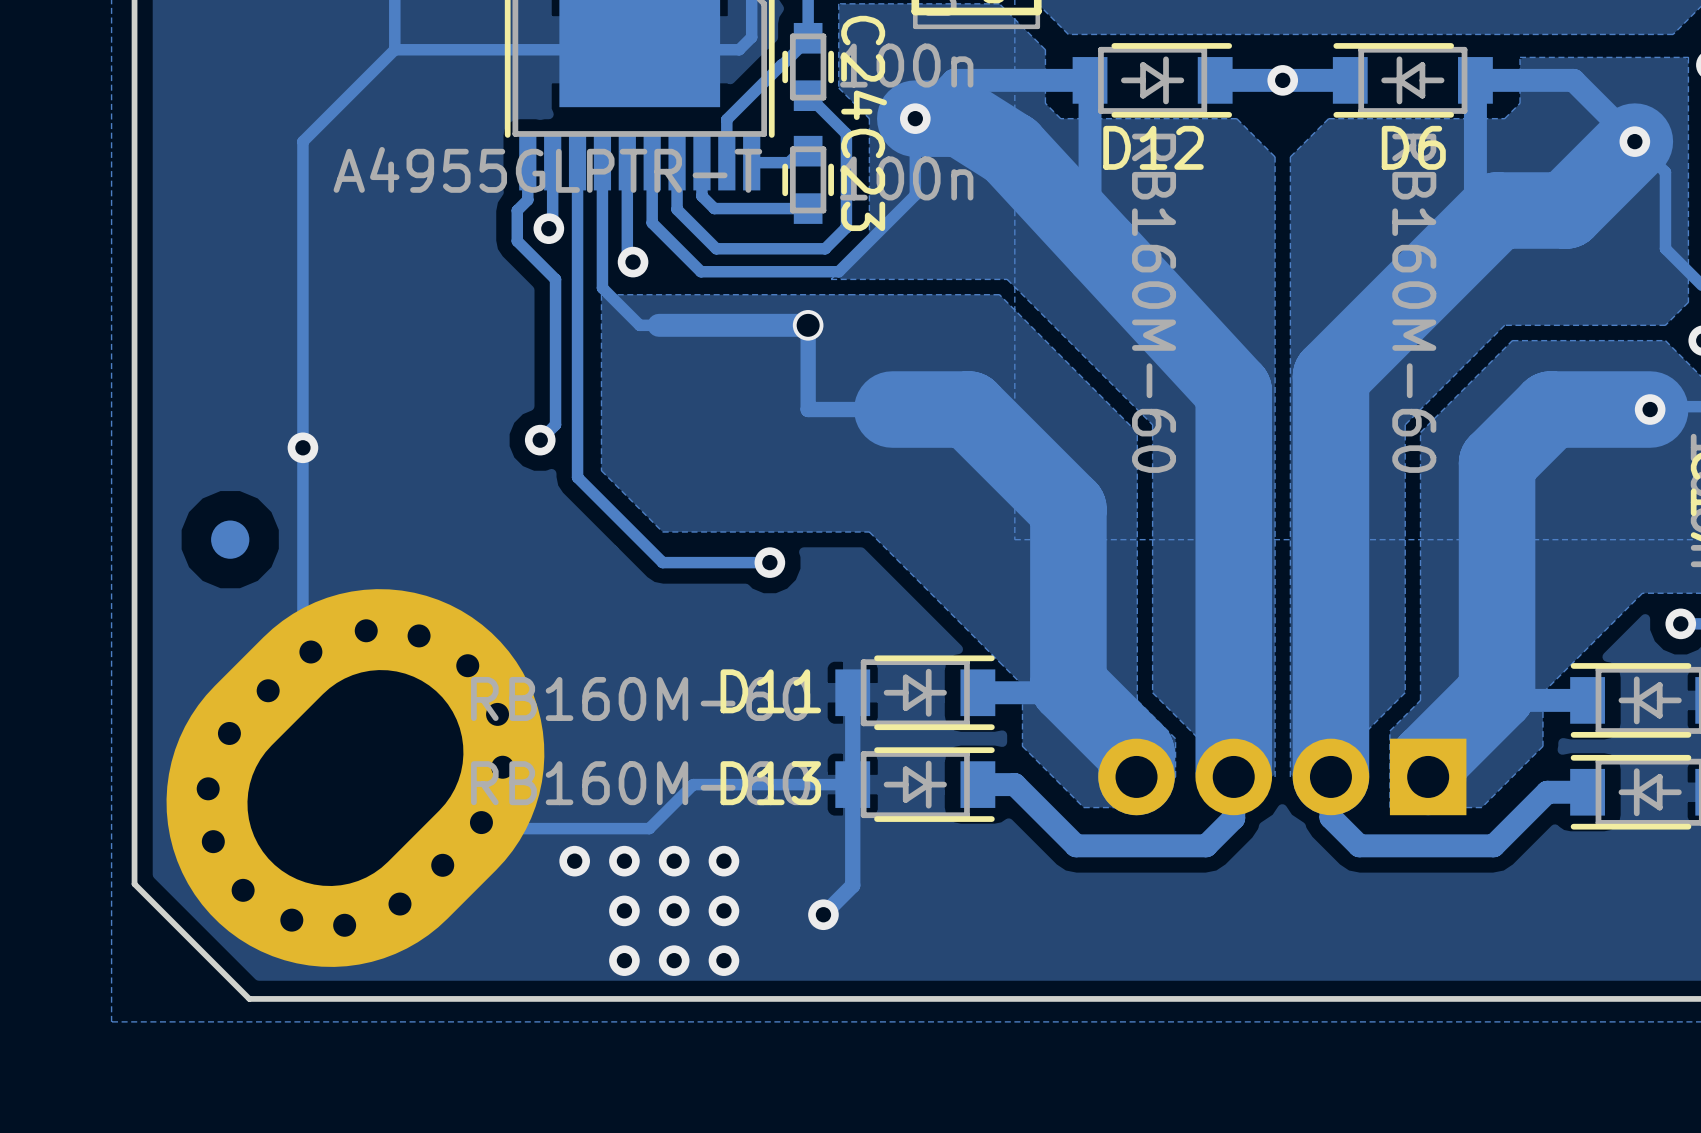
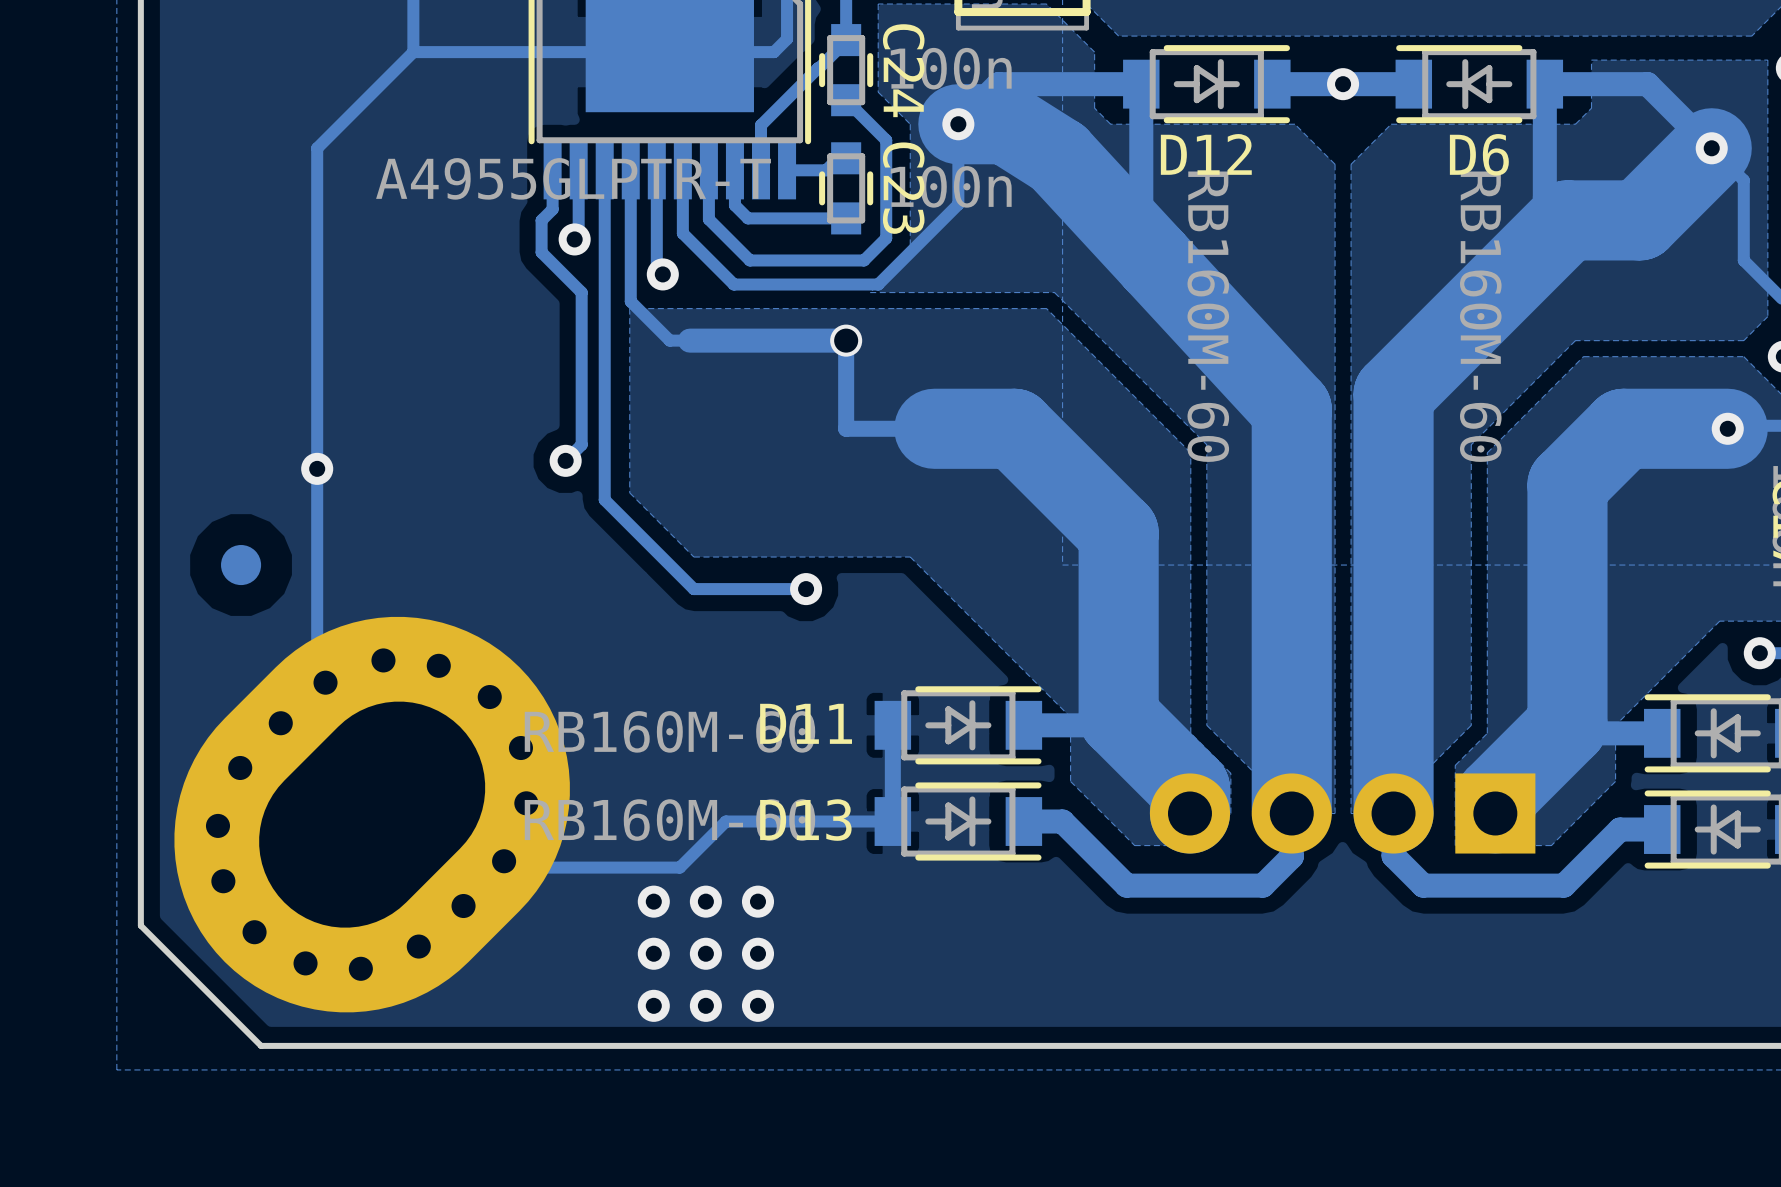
track: (852, 784) (852, 885) (823, 914) -> none
via: (574, 861) -> none
via: (823, 914) -> none

